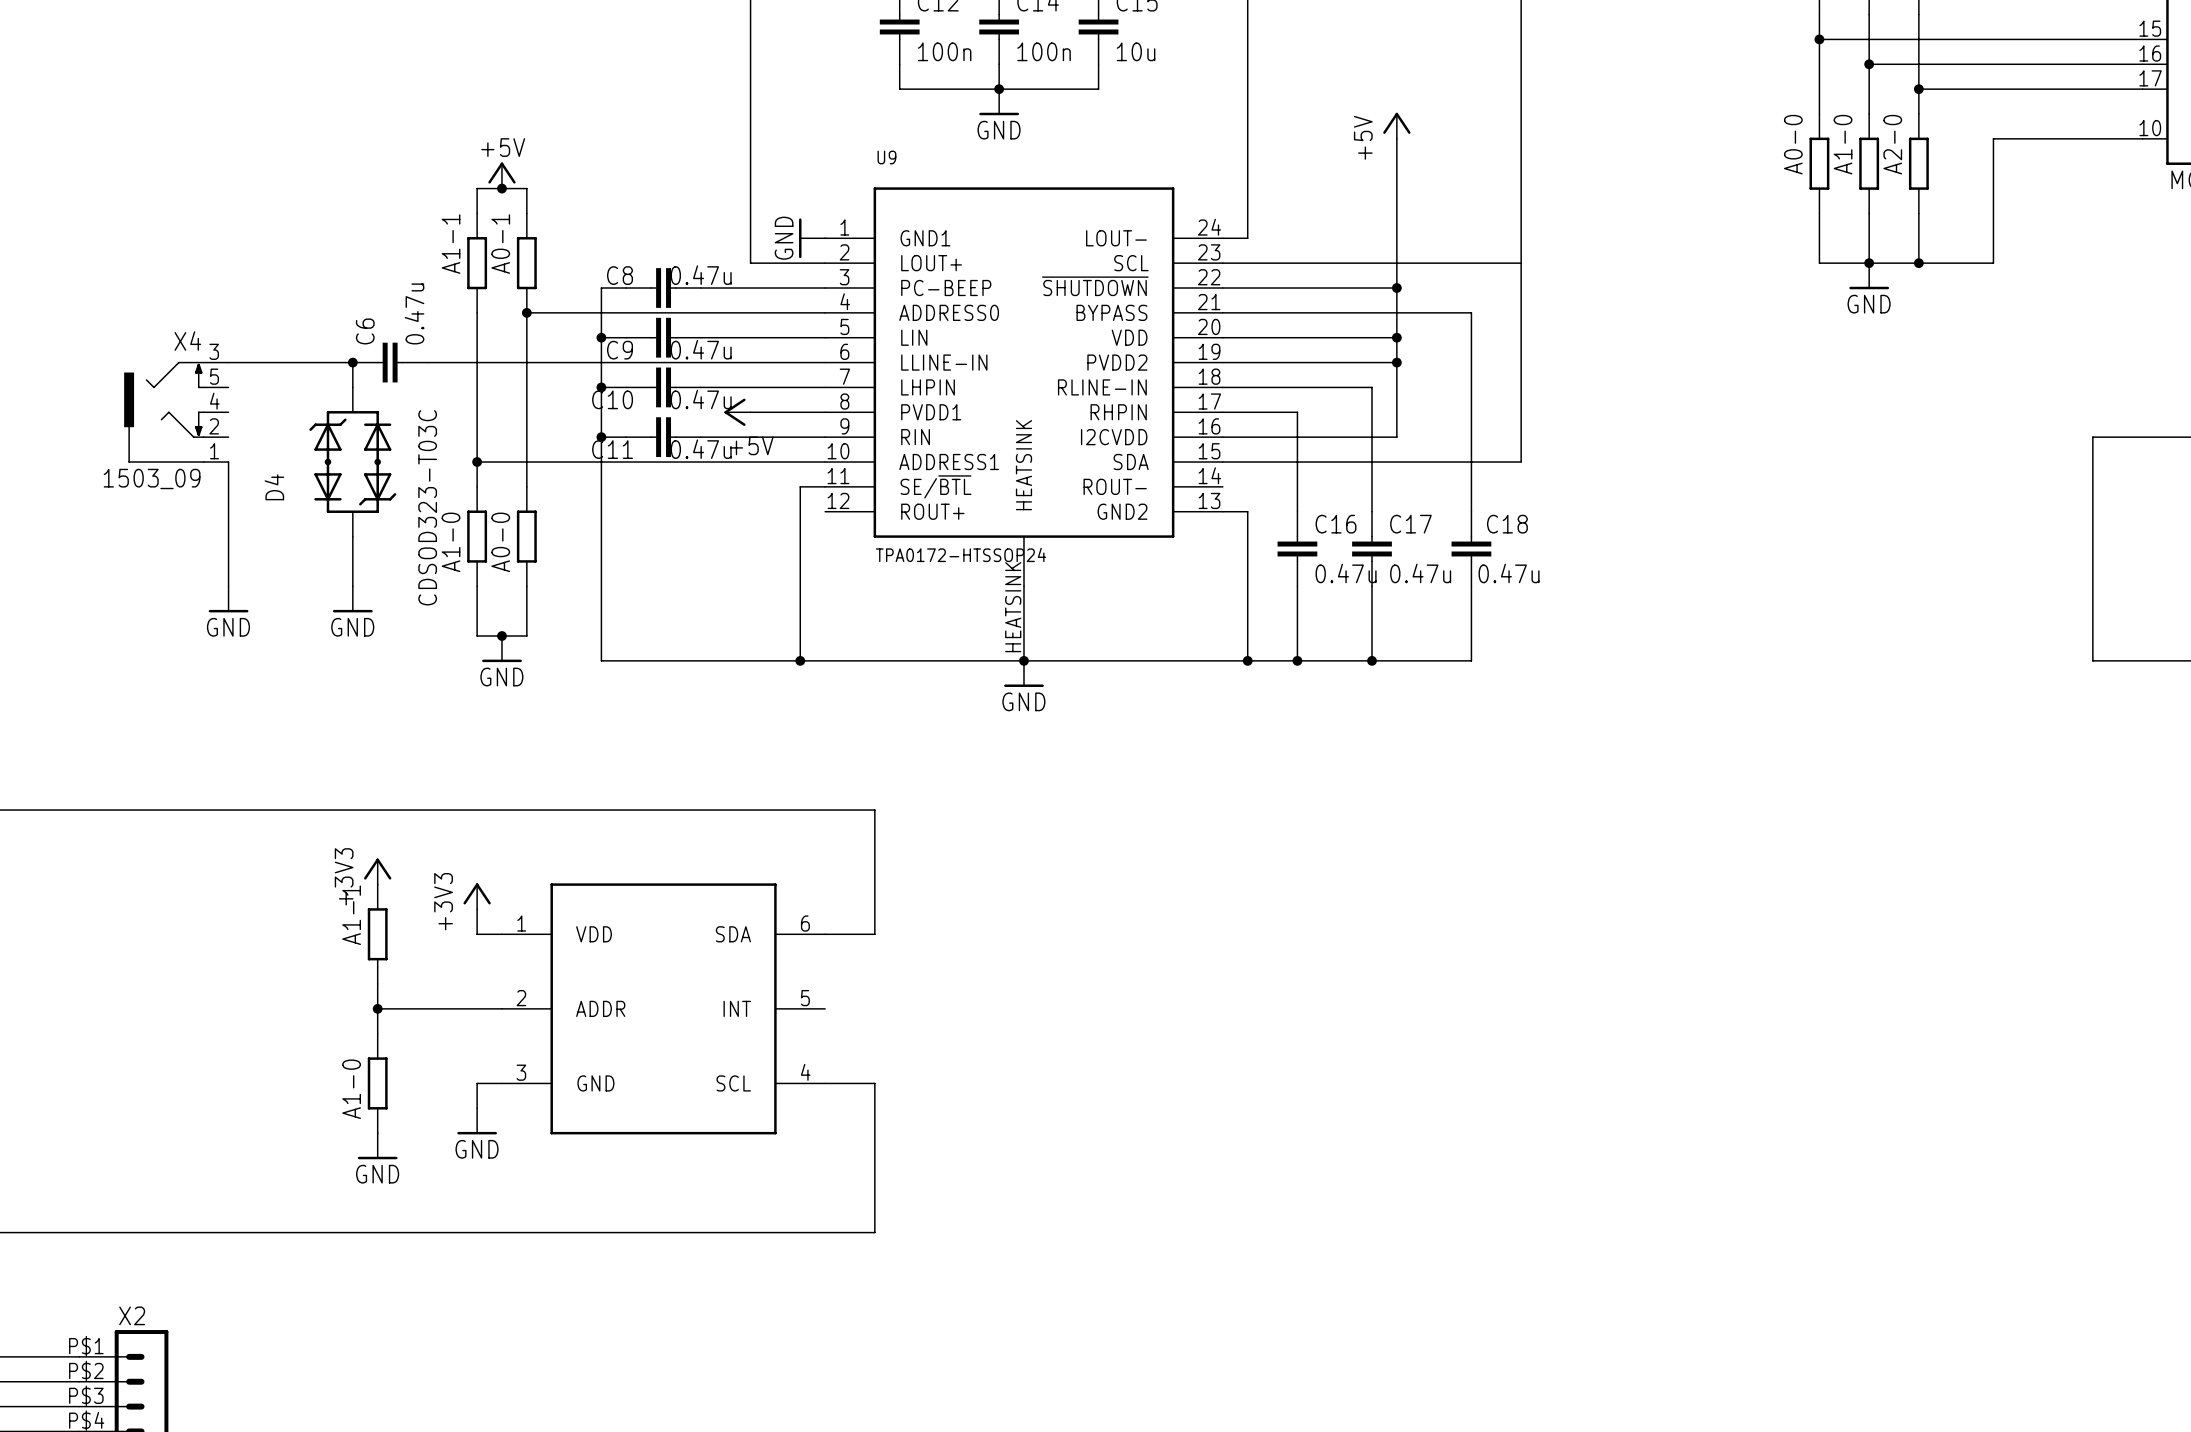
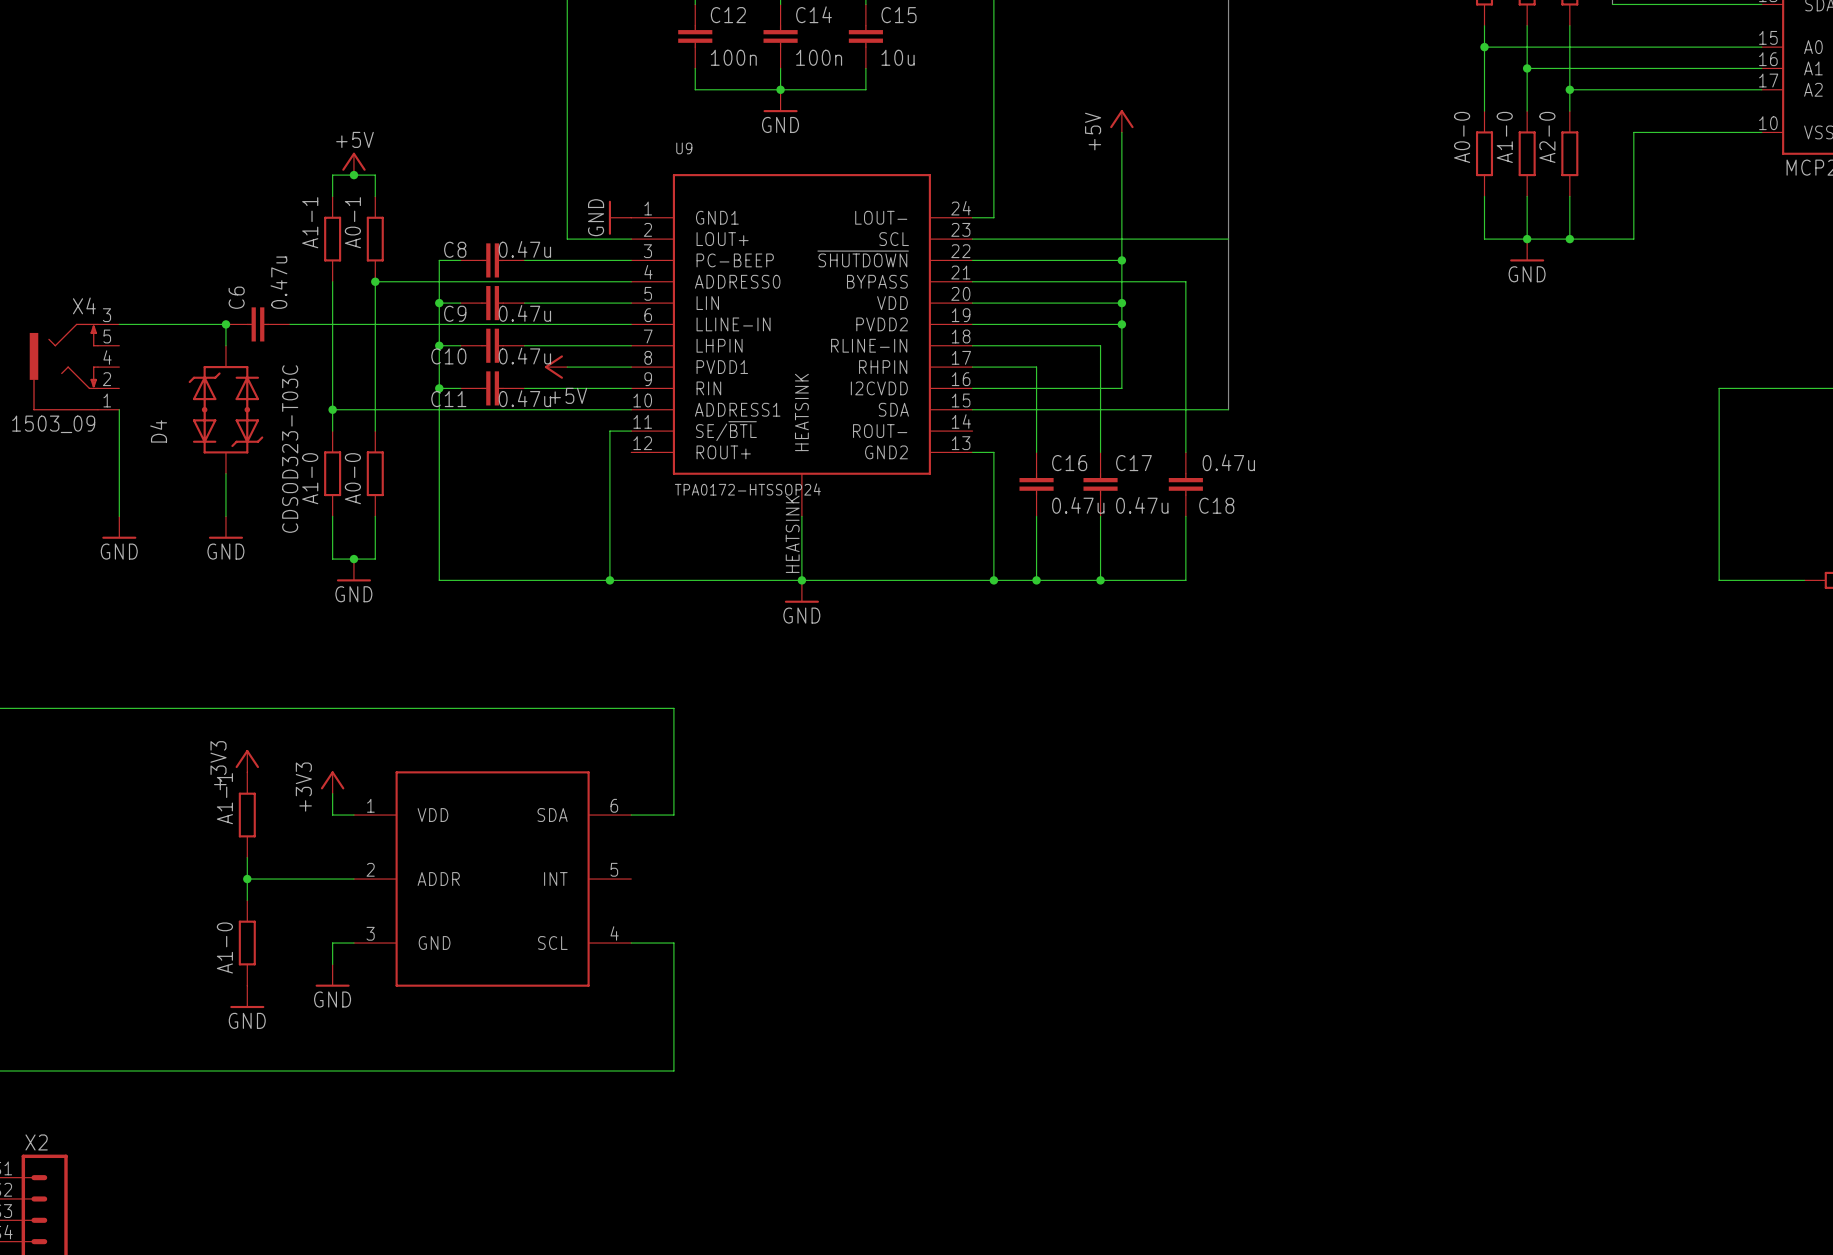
C18 name position: C18 (1507, 524) -> C18 (1216, 505)
C18 value position: 0.47u (1509, 573) -> 0.47u (1228, 462)

